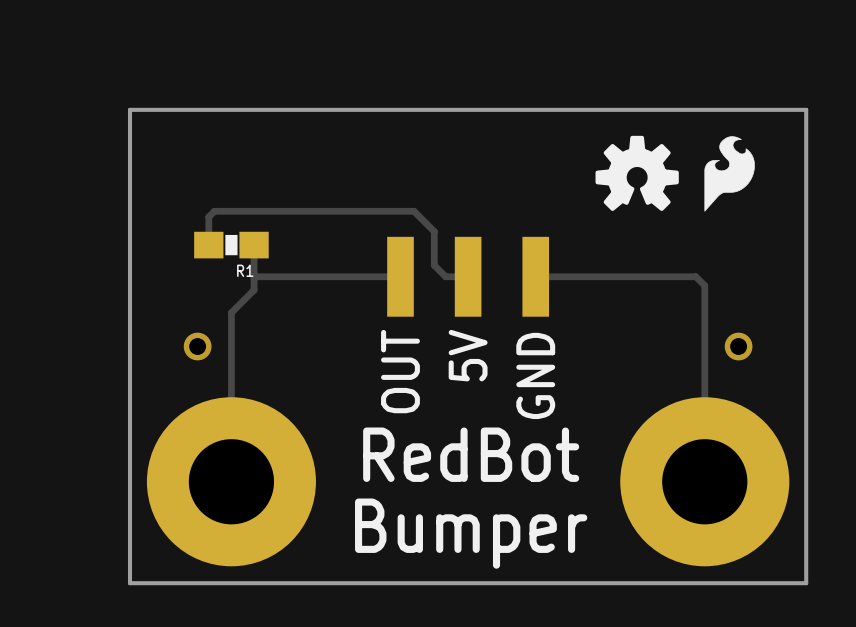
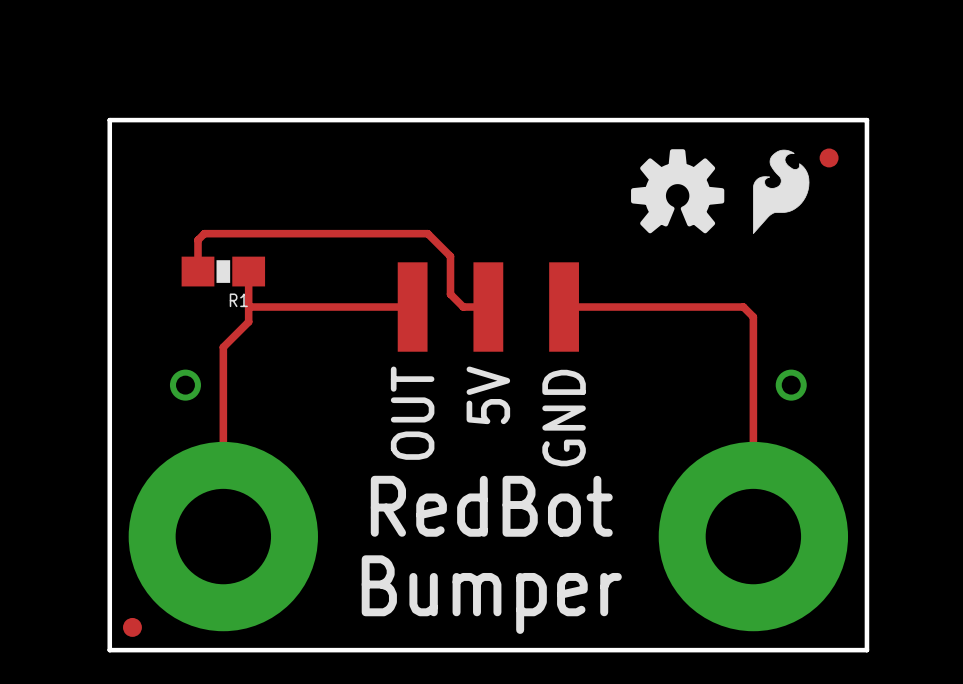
part: none -> (829, 157)
part: none -> (132, 627)

